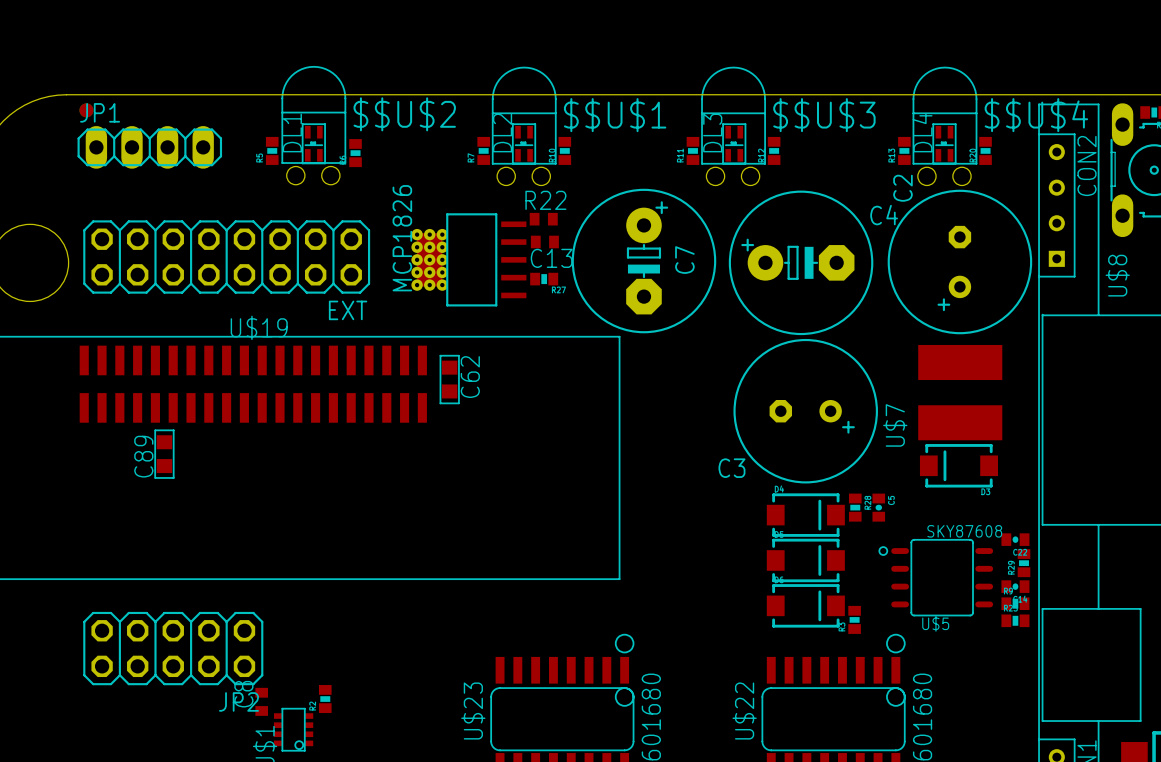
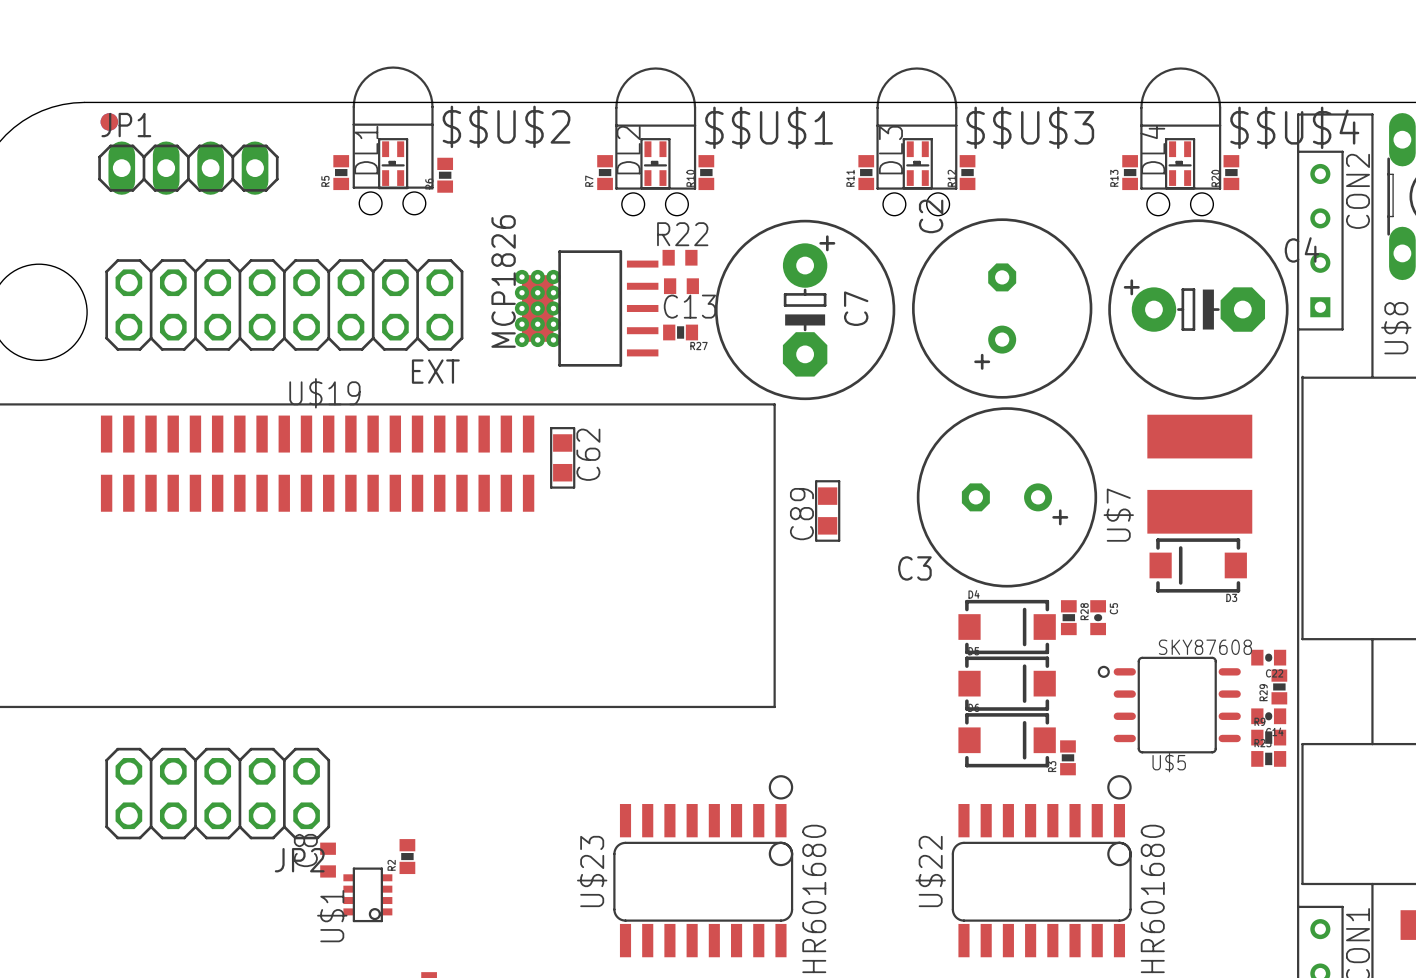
C4 position: (801, 262) -> (1198, 309)
C2 position: (959, 262) -> (1002, 308)
C89 position: (164, 454) -> (827, 510)

